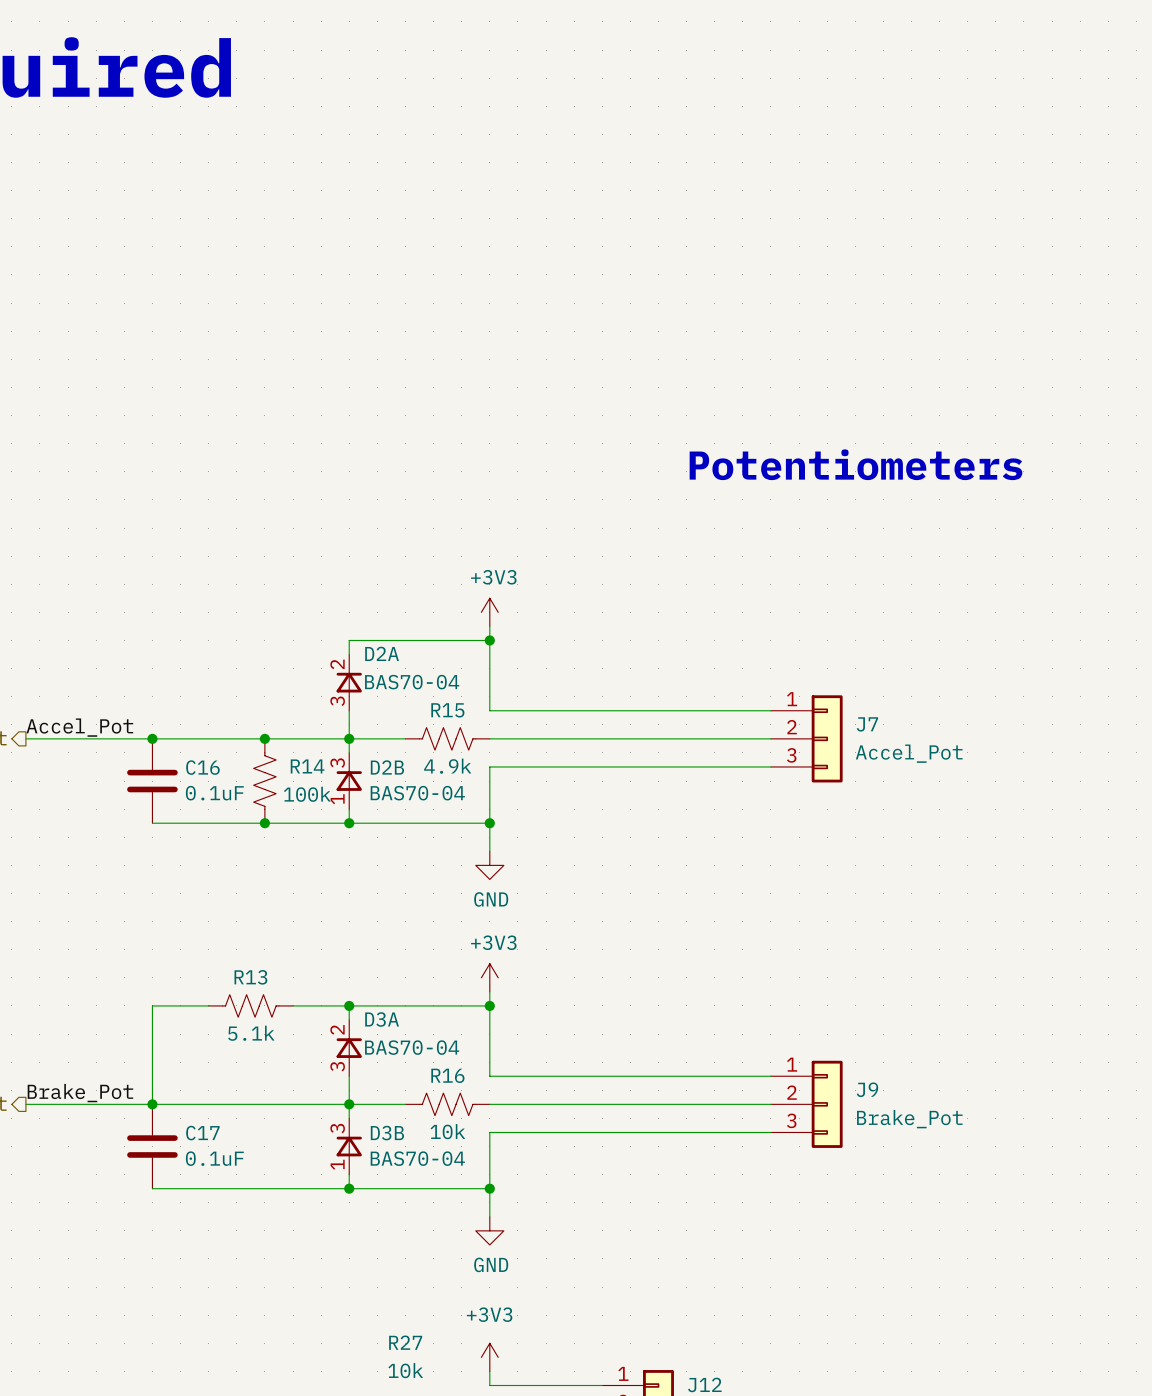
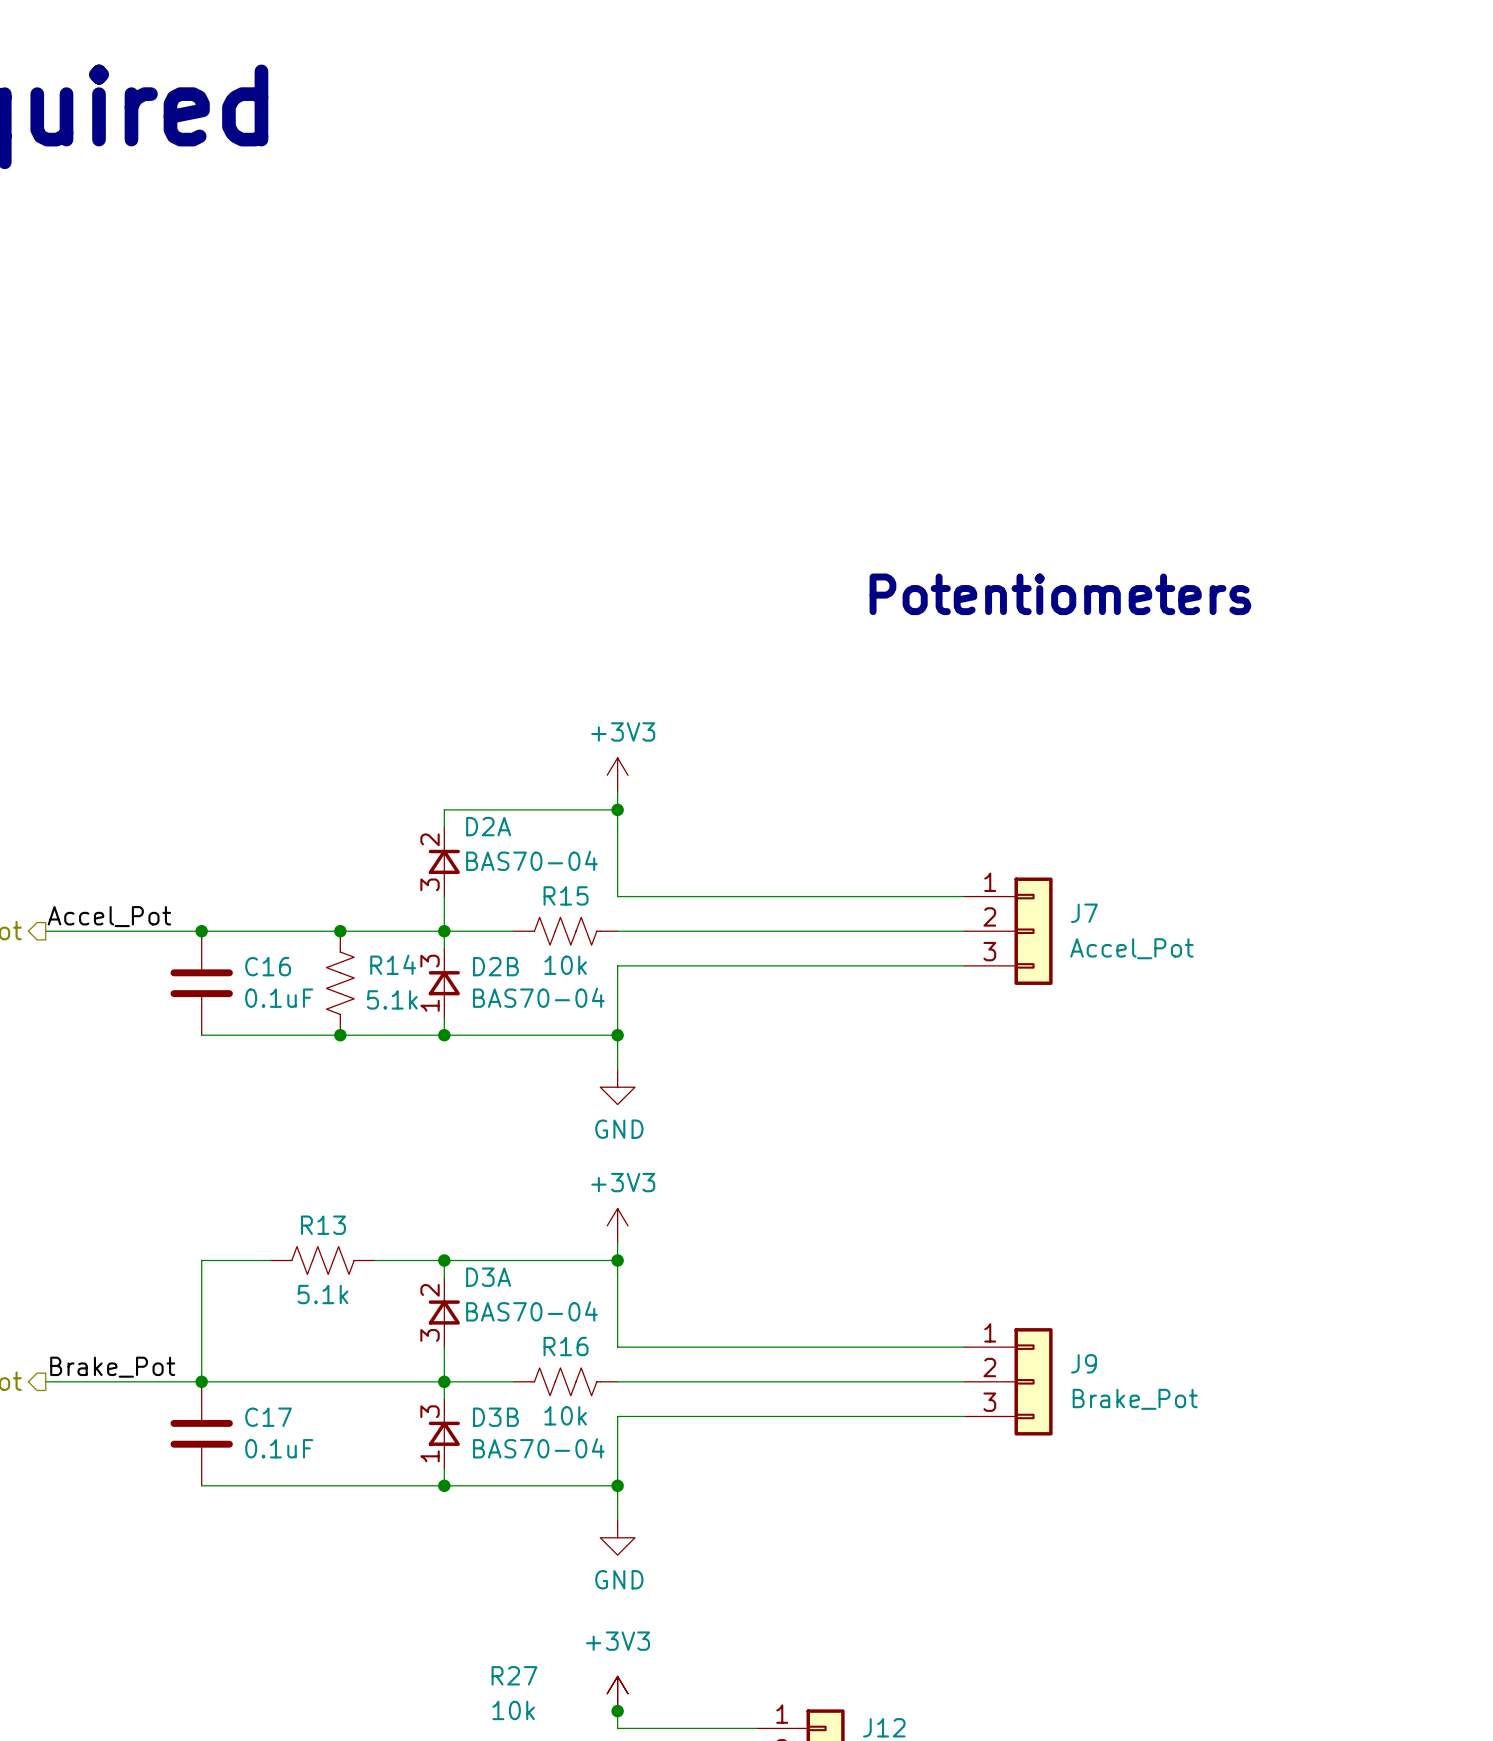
R15 value: 4.9k (447, 766) -> 10k (565, 965)
R14 value: 100k (307, 794) -> 5.1k (392, 999)
power symbol: none -> (617, 1693)
junction: none -> (617, 1711)

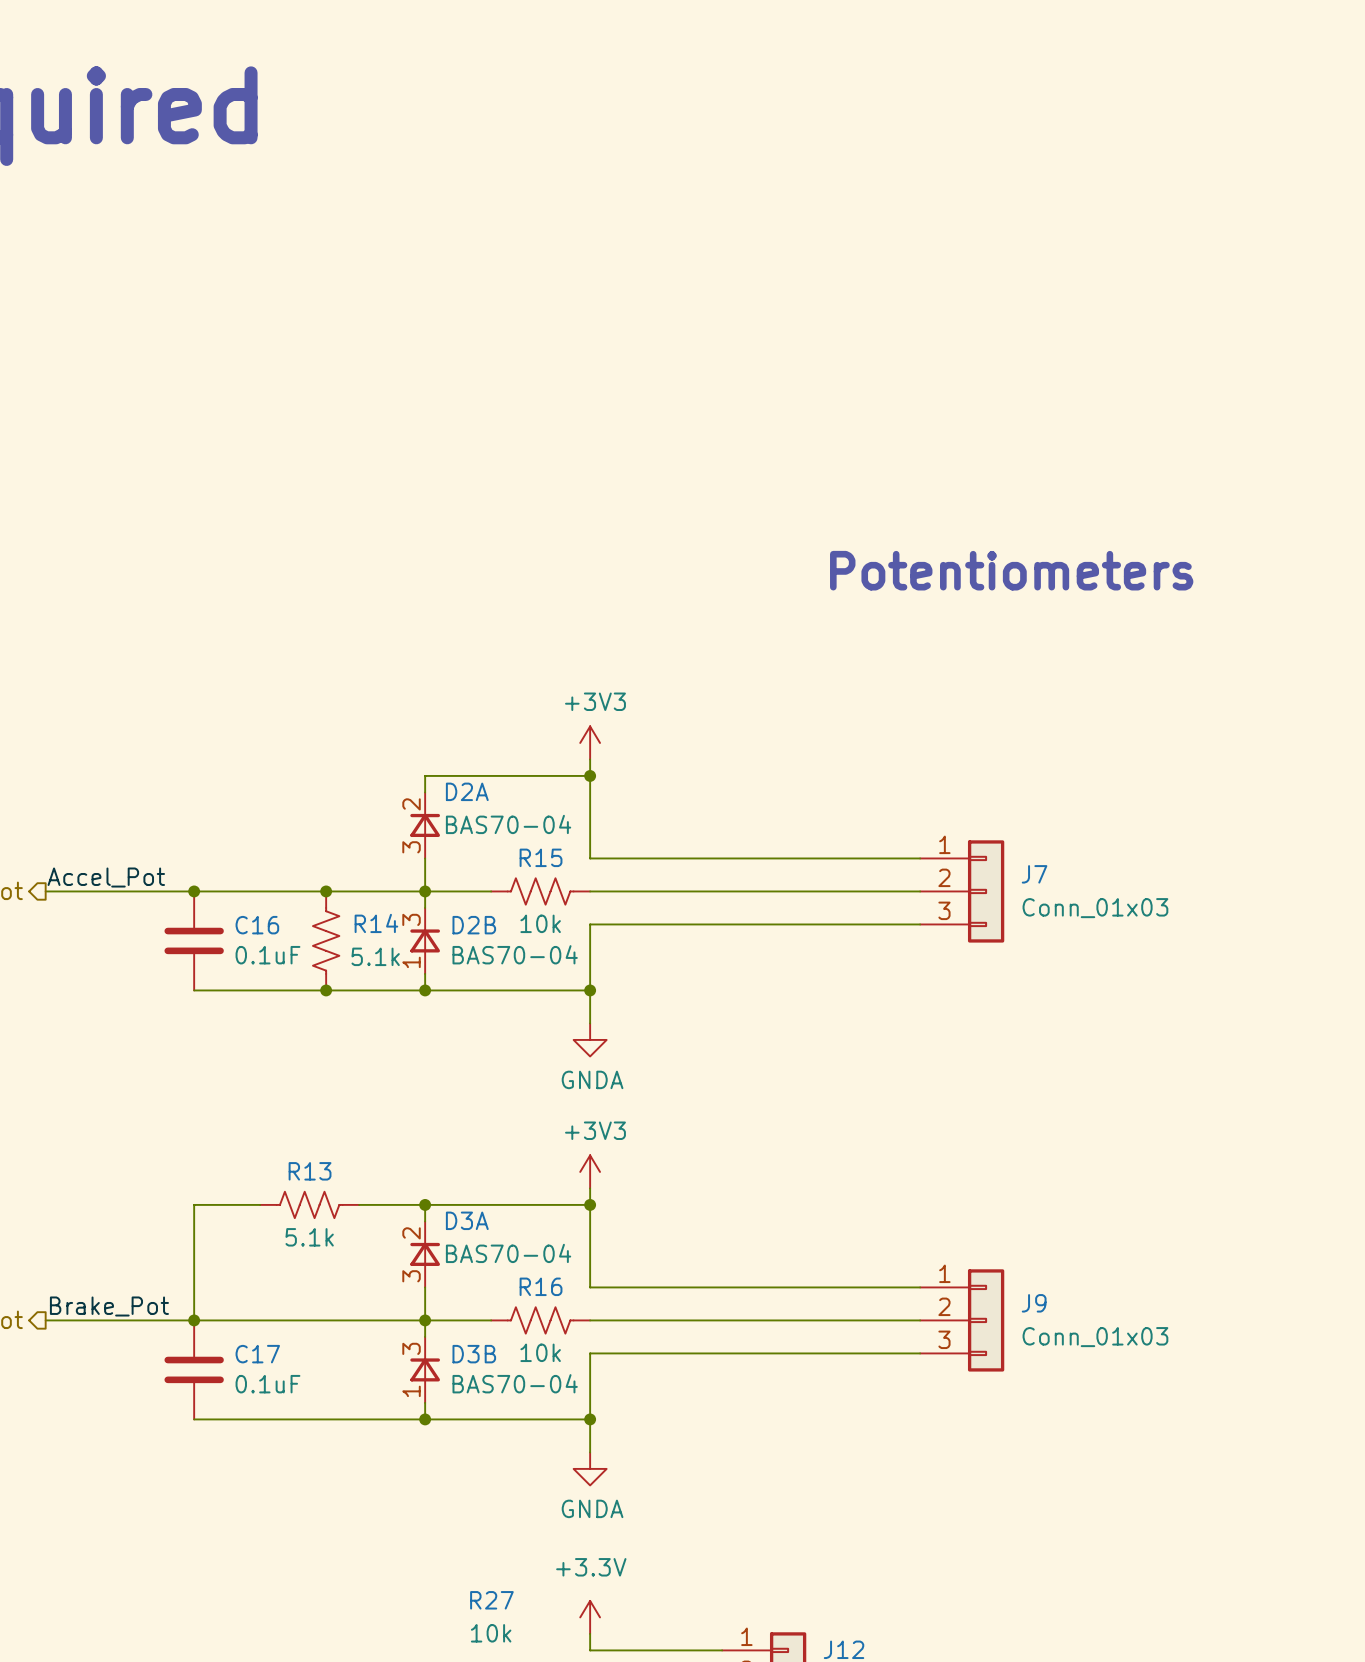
J7 value: Accel_Pot (1131, 948) -> Conn_01x03 (1095, 908)
power symbol: GND (617, 1087) -> GNDA (590, 1039)
J9 value: Brake_Pot (1135, 1399) -> Conn_01x03 (1095, 1337)
power symbol: GND (617, 1537) -> GNDA (590, 1468)
power symbol: (617, 1693) -> none
power symbol: +3V3 (617, 1693) -> none
power symbol: none -> +3.3V (590, 1617)
junction: (617, 1711) -> none

